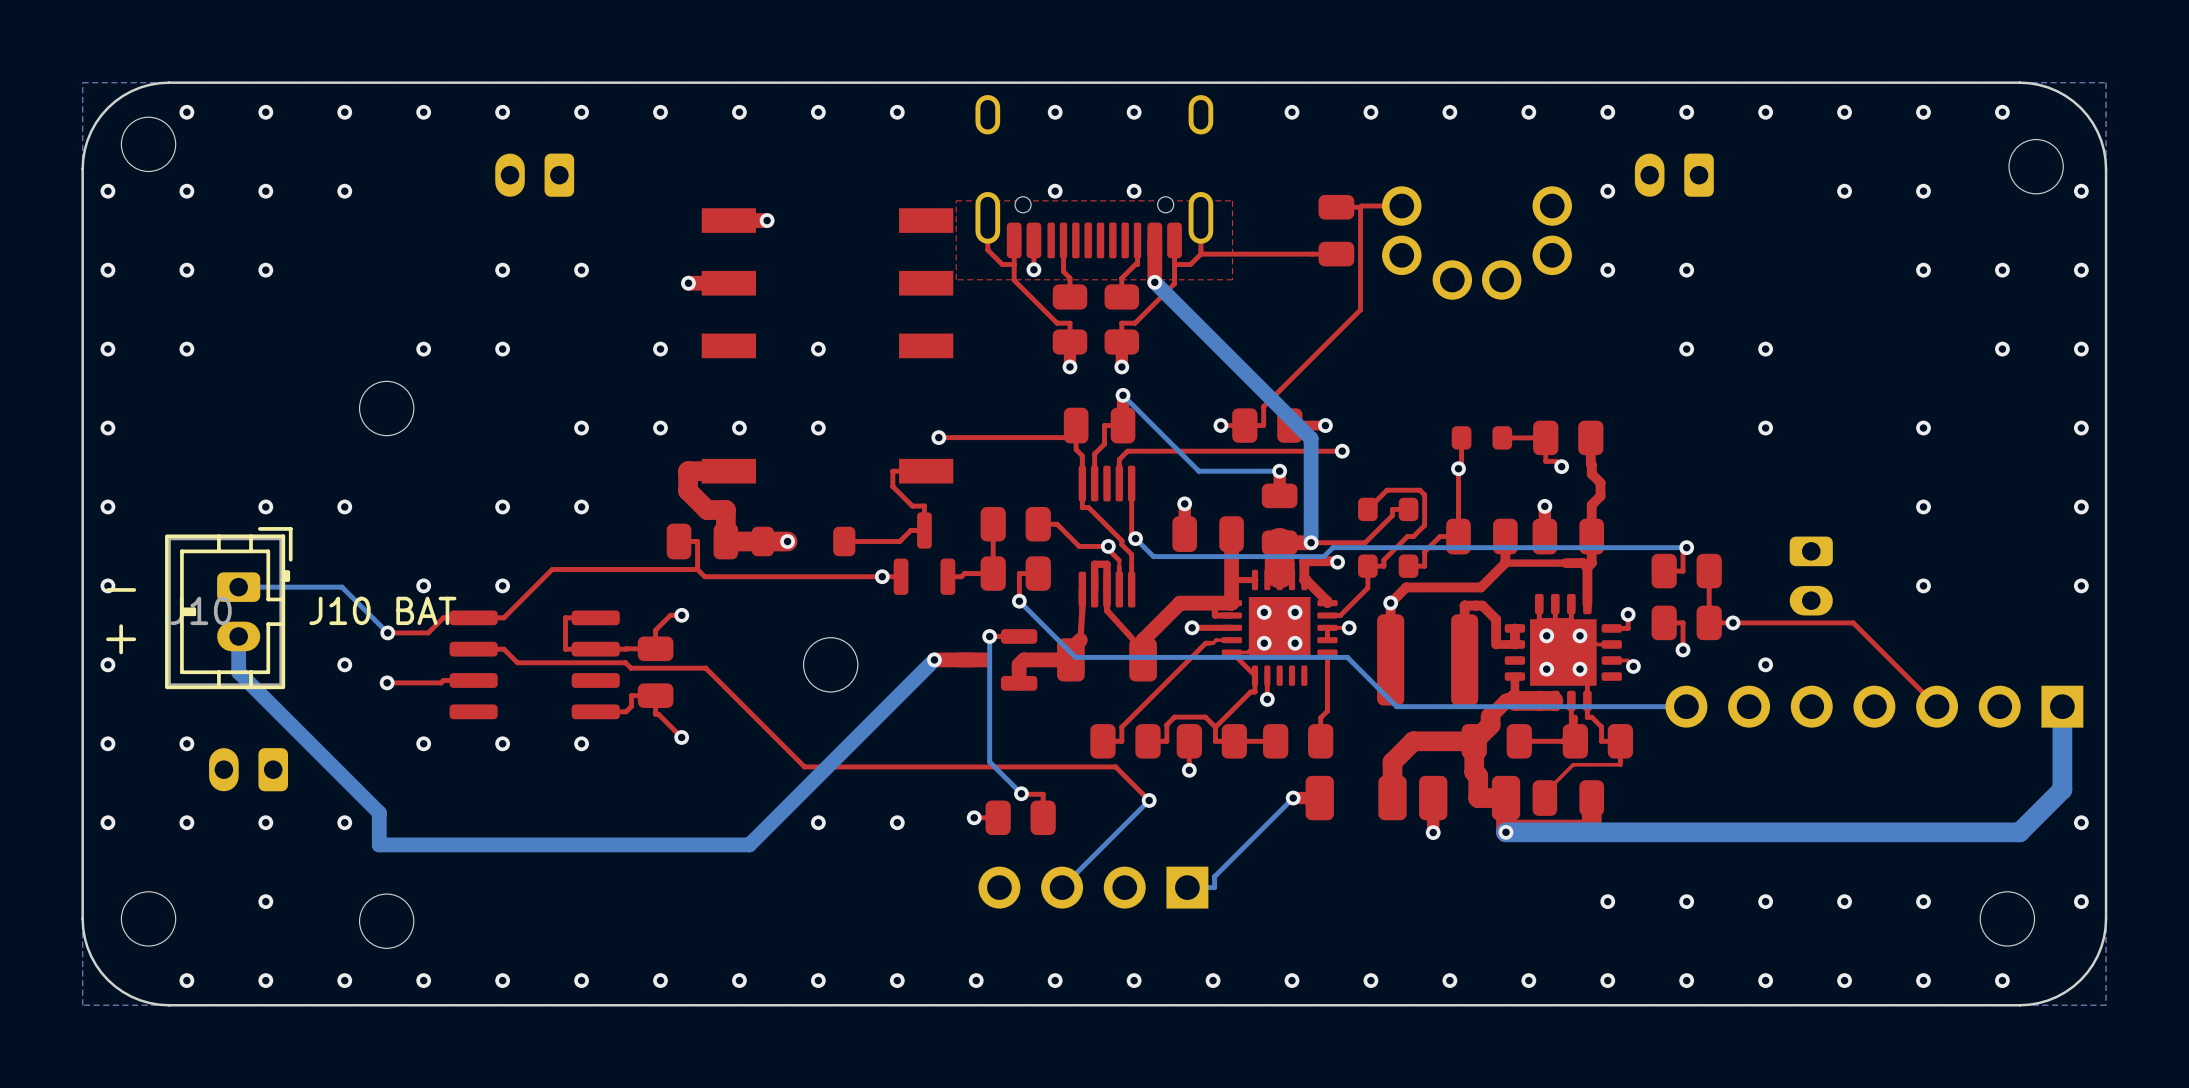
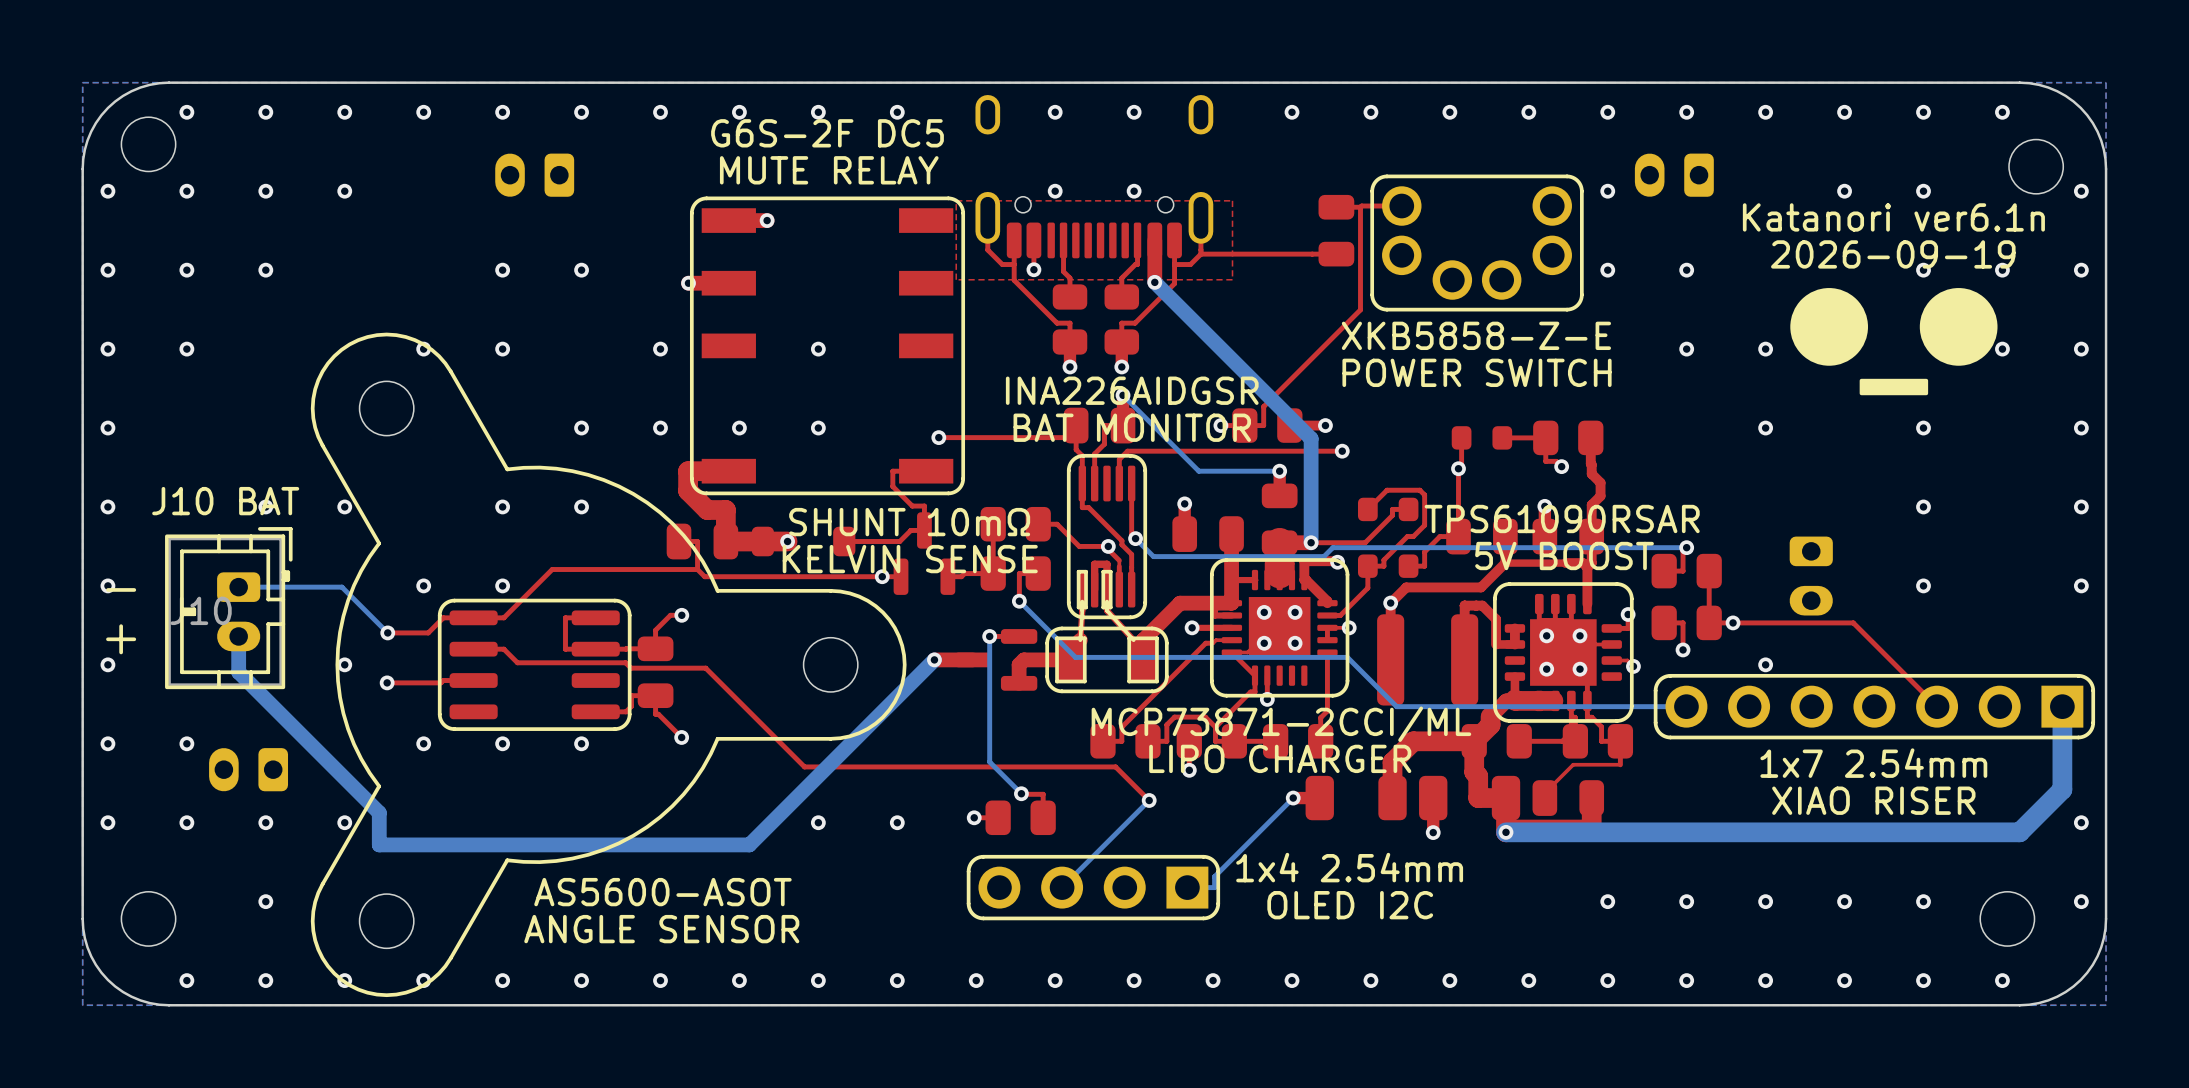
text: none -> G6S-2F DC5 (827, 133)
text: none -> MUTE RELAY (829, 170)
line: none -> (1567, 176) (1386, 176) (1379, 178) (1374, 183) (1372, 191) (1372, 294) (1374, 302) (1379, 307) (1386, 309) (1567, 309) (1574, 307) (1579, 302) (1581, 294) (1581, 191) (1577, 180) (1567, 176)
line: none -> (948, 198) (706, 198) (694, 204) (691, 213) (691, 478) (697, 490) (706, 493) (948, 493) (960, 487) (963, 478) (963, 213) (958, 202) (948, 198)
text: none -> Katanori ver6.1n (1893, 217)
text: none -> 2026-09-19 (1893, 254)
drawing: none -> [1790, 288, 1998, 396]
text: none -> XKB5858-Z-E (1476, 335)
line: none -> (450, 371) (507, 469) (539, 467) (572, 471) (603, 480) (633, 493) (660, 512) (683, 535) (702, 561) (717, 590) (840, 591) (867, 600) (889, 619) (899, 636) (904, 655) (904, 674) (899, 693) (889, 709) (875, 723) (859, 733) (830, 738) (717, 738) (702, 768) (683, 794) (660, 817) (633, 835) (603, 849) (572, 858) (539, 862) (507, 860) (450, 958) (439, 973) (415, 989) (396, 994) (377, 994) (358, 989) (334, 973) (322, 958) (313, 930) (313, 911) (318, 892) (379, 786) (361, 758) (348, 729) (340, 697) (337, 664) (340, 632) (348, 600) (361, 570) (379, 543) (318, 436) (313, 418) (313, 398) (318, 380) (334, 356) (349, 344) (377, 335) (405, 337) (423, 344) (439, 356) (450, 371)
text: none -> POWER SWITCH (1477, 372)
text: none -> INA226AIDGSR (1132, 390)
text: none -> BAT MONITOR (1132, 427)
line: none -> (1130, 455) (1081, 455) (1074, 458) (1069, 466) (1068, 604) (1073, 613) (1079, 616) (1132, 617) (1140, 613) (1144, 606) (1145, 468) (1140, 460) (1130, 455)
text: none -> TPS61090RSAR (1562, 518)
text: none -> SHUNT 10mΩ (909, 522)
text: none -> 5V BOOST (1564, 555)
text: none -> KELVIN SENSE (910, 559)
line: none -> (1332, 560) (1226, 560) (1216, 564) (1211, 574) (1211, 680) (1216, 691) (1226, 695) (1332, 695) (1343, 691) (1347, 680) (1347, 572) (1341, 563) (1332, 560)
line: none -> (1086, 571) (1078, 571) (1078, 607) (1086, 607) (1086, 571)
line: none -> (1110, 571) (1103, 571) (1103, 607) (1110, 607) (1110, 571)
line: none -> (1617, 584) (1509, 584) (1499, 588) (1494, 598) (1494, 706) (1499, 716) (1509, 720) (1617, 720) (1627, 716) (1631, 706) (1631, 596) (1627, 588) (1617, 584)
line: none -> (614, 600) (454, 600) (445, 603) (439, 615) (439, 714) (442, 723) (454, 729) (614, 729) (623, 726) (629, 714) (629, 613) (625, 604) (614, 600)
line: none -> (1082, 601) (1080, 640)
line: none -> (1106, 601) (1106, 610) (1133, 640)
text position: J10 BAT (382, 610) -> J10 BAT (225, 501)
line: none -> (1152, 628) (1061, 628) (1054, 630) (1047, 641) (1047, 676) (1049, 683) (1054, 689) (1061, 691) (1152, 691) (1159, 689) (1166, 678) (1166, 641) (1162, 632) (1152, 628)
line: none -> (1084, 638) (1057, 638) (1057, 681) (1084, 681) (1084, 638)
line: none -> (1156, 638) (1129, 638) (1129, 681) (1156, 681) (1156, 638)
line: none -> (2078, 675) (1668, 675) (1659, 680) (1656, 686) (1655, 724) (1661, 734) (1670, 737) (2080, 737) (2088, 733) (2092, 726) (2093, 690) (2088, 680) (2078, 675)
text: none -> MCP73871-2CCI/ML (1281, 724)
text: none -> LIPO CHARGER (1280, 758)
text: none -> 1x7 2.54mm (1873, 763)
text: none -> XIAO RISER (1873, 800)
line: none -> (1203, 856) (979, 857) (972, 861) (969, 867) (969, 907) (974, 915) (983, 918) (1207, 917) (1213, 914) (1217, 907) (1218, 871) (1213, 861) (1203, 856)
text: none -> 1x4 2.54mm (1349, 867)
text: none -> AS5600-ASOT (662, 892)
text: none -> OLED I2C (1350, 905)
text: none -> ANGLE SENSOR (661, 929)

